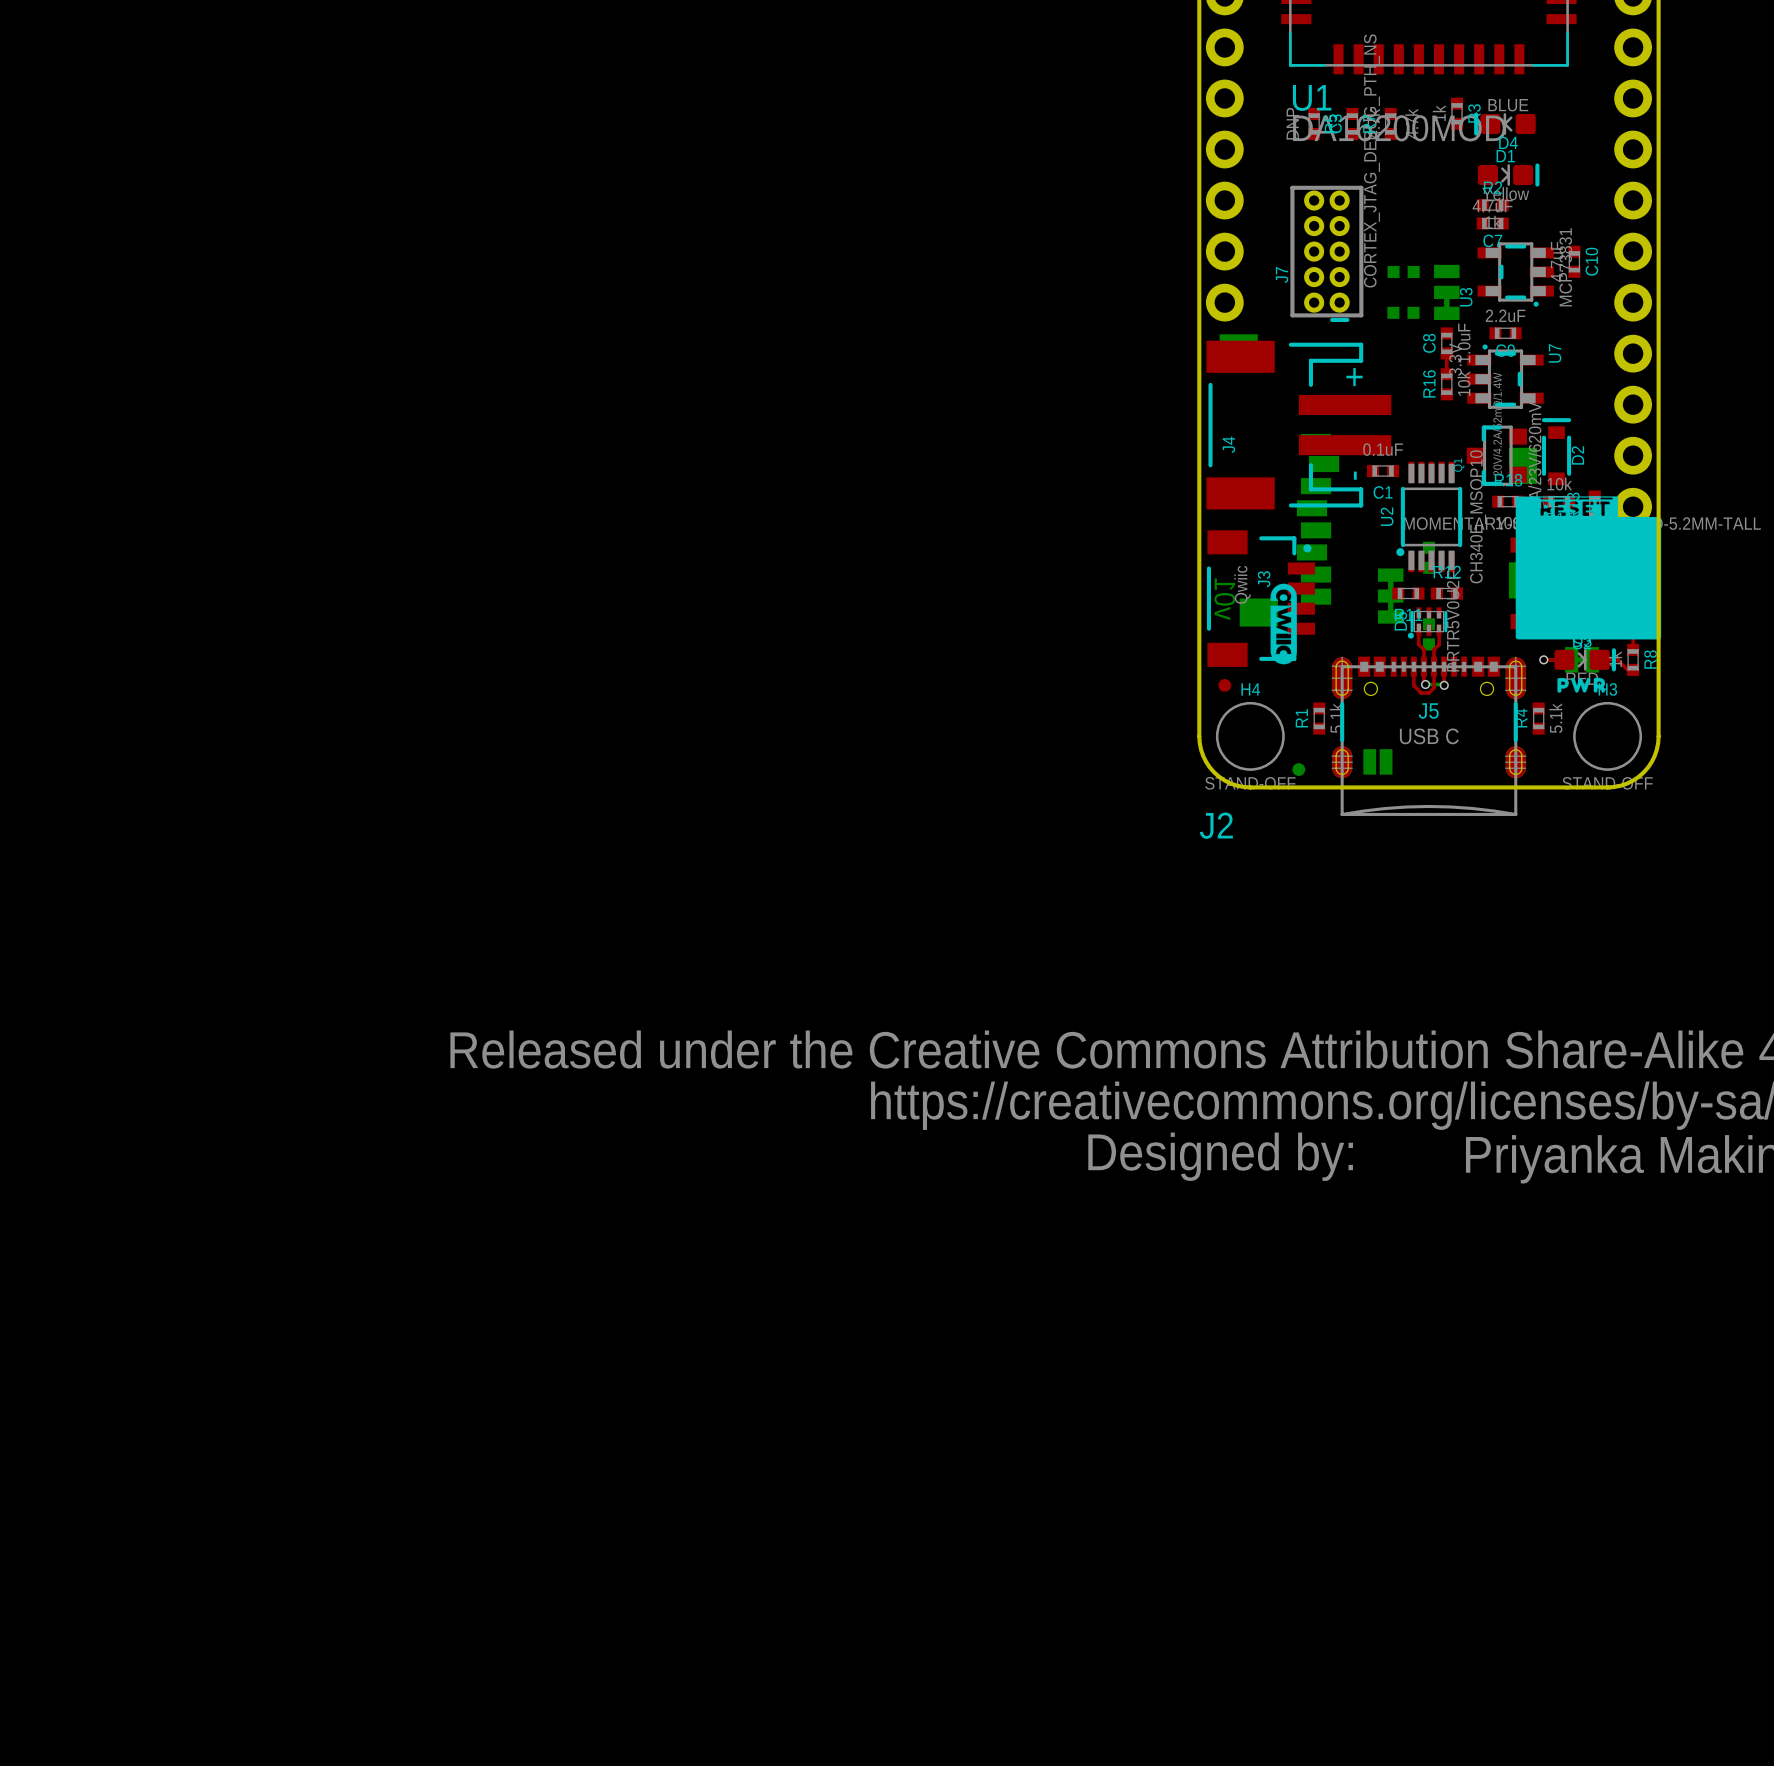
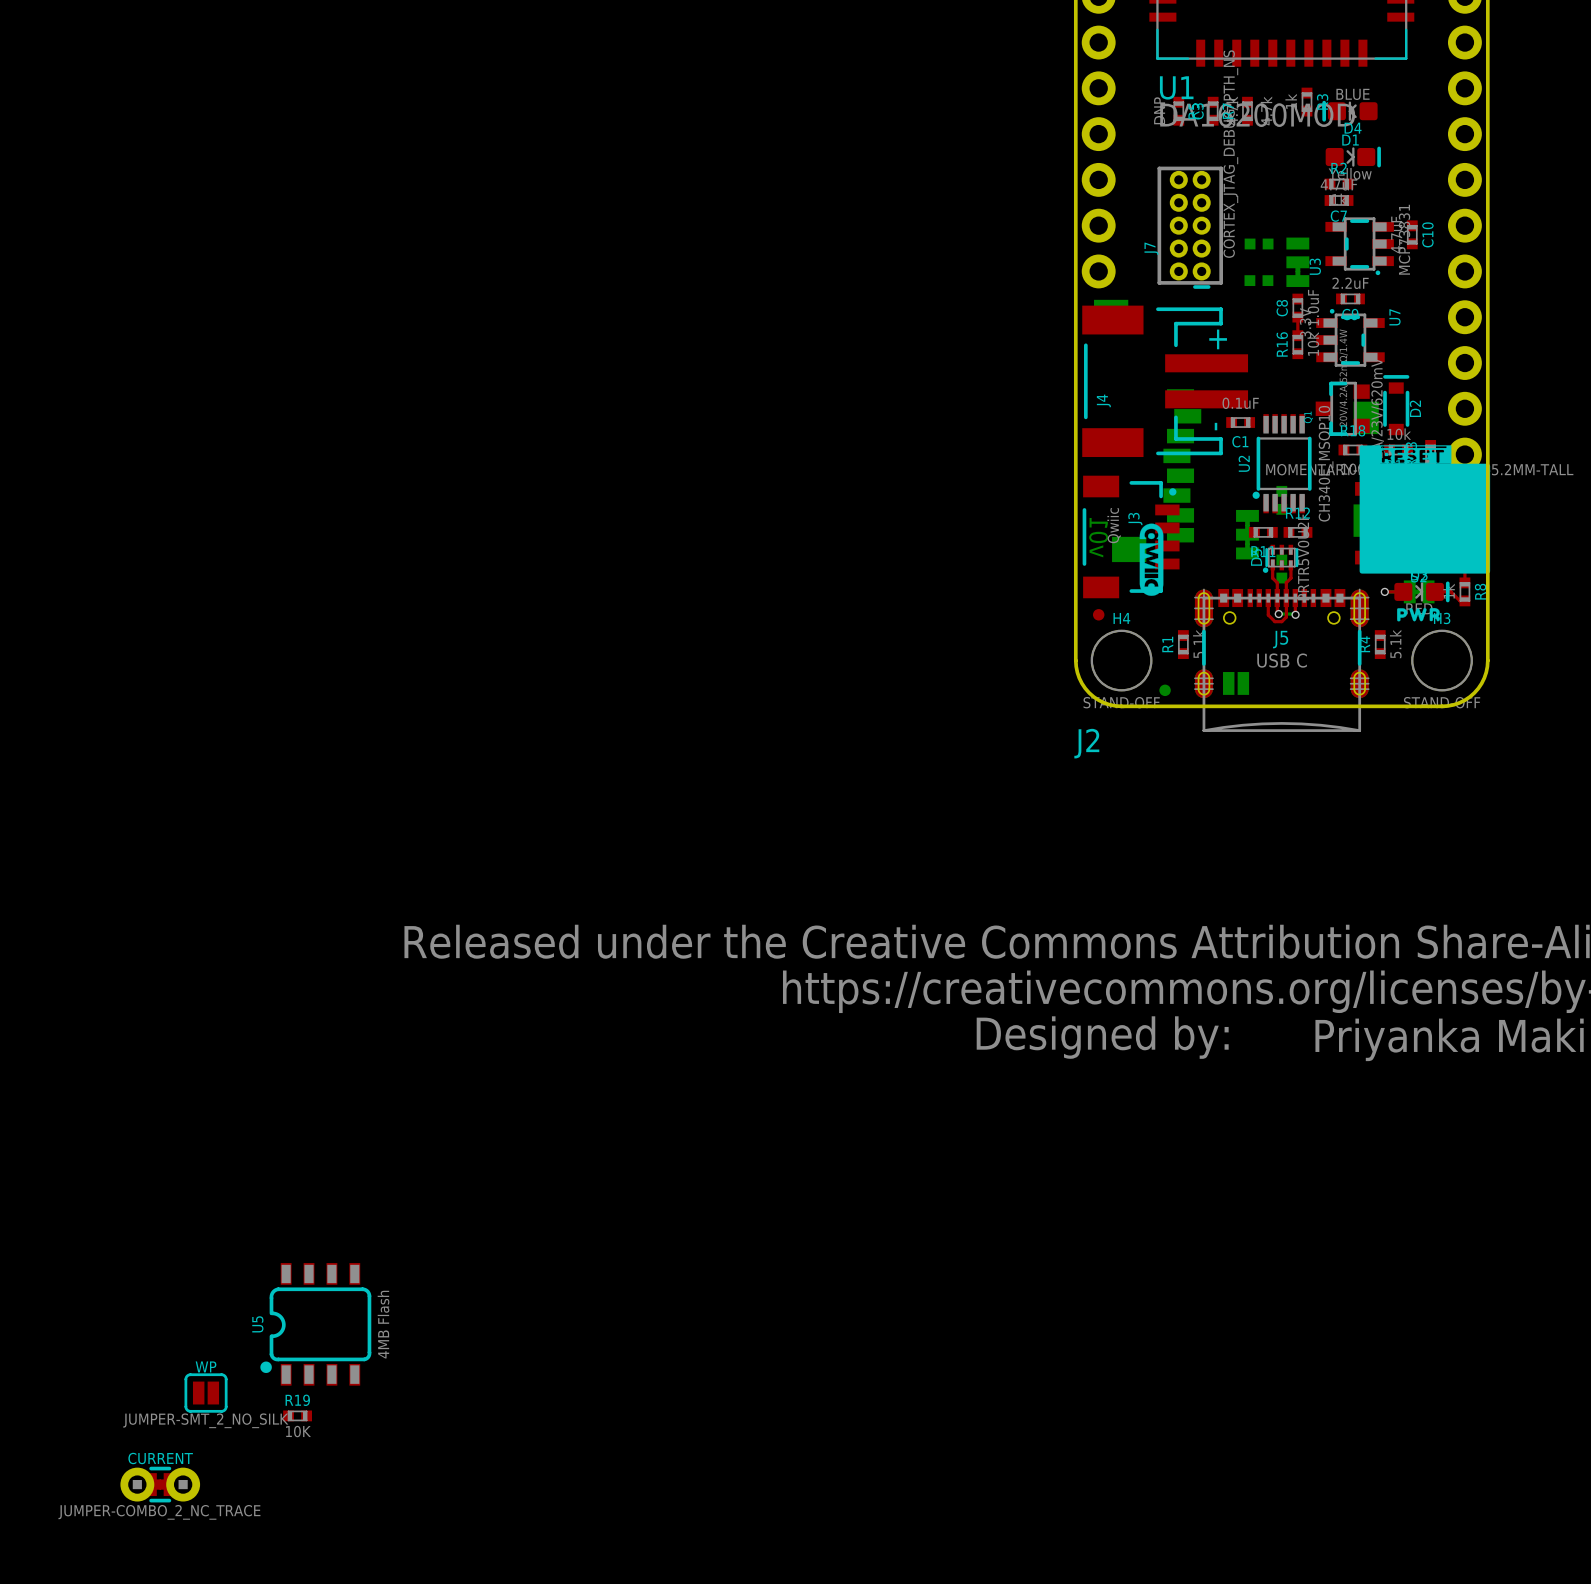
U5: none -> 4MB Flash (315, 1324)
WP: none -> JUMPER-SMT_2_NO_SILK (206, 1393)
R19: none -> 10K (297, 1415)
CURRENT: none -> JUMPER-COMBO_2_NC_TRACE (160, 1484)

